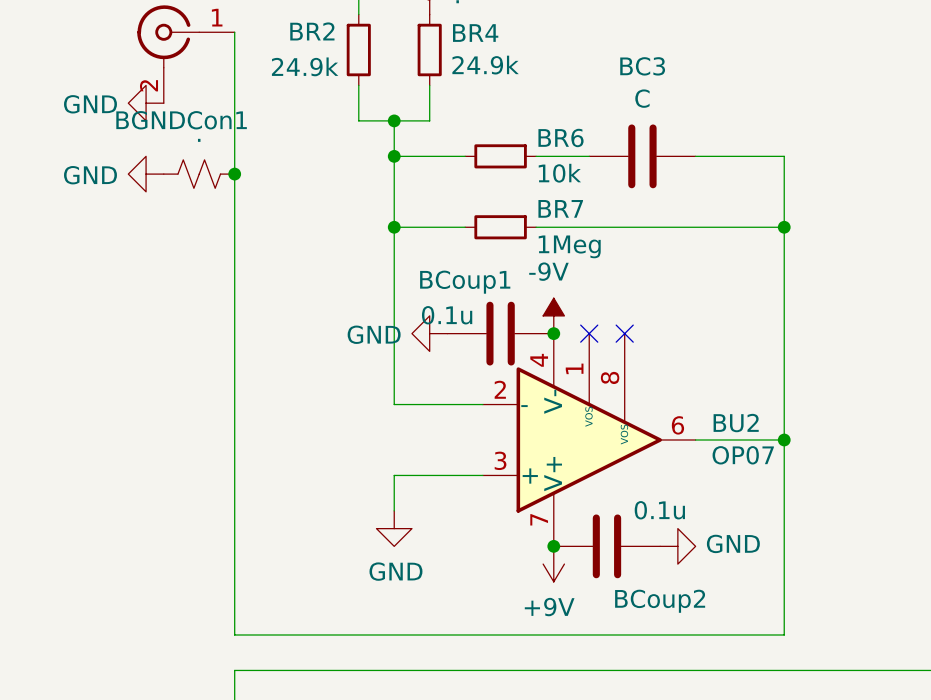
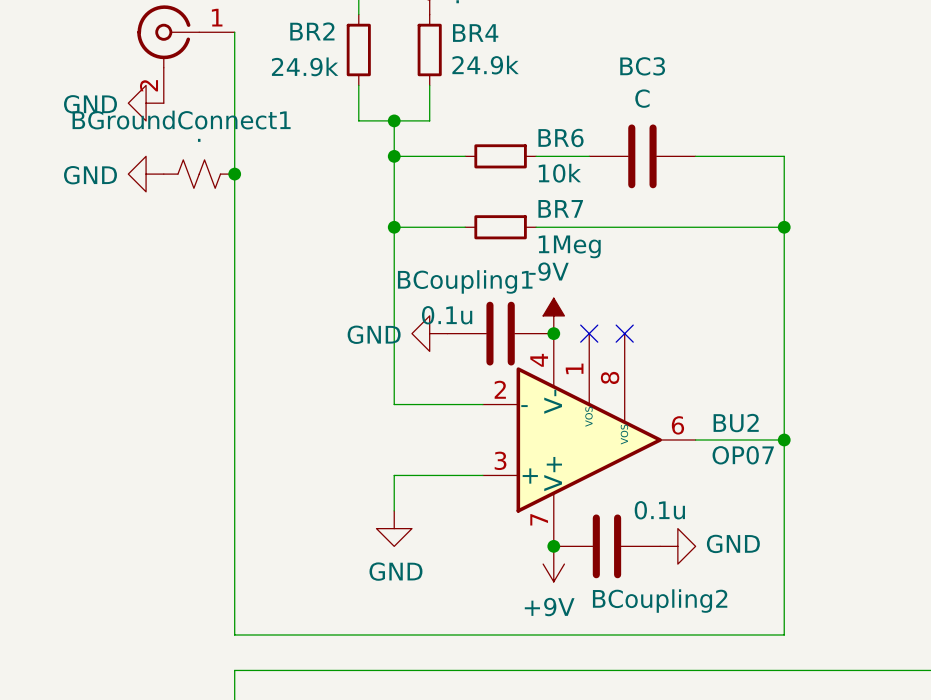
BGNDCon1 name: BGNDCon1 (181, 120) -> BGroundConnect1 (181, 120)
BCoup1 name: BCoup1 (465, 282) -> BCoupling1 (465, 281)
BCoup2 name: BCoup2 (660, 601) -> BCoupling2 (660, 601)

